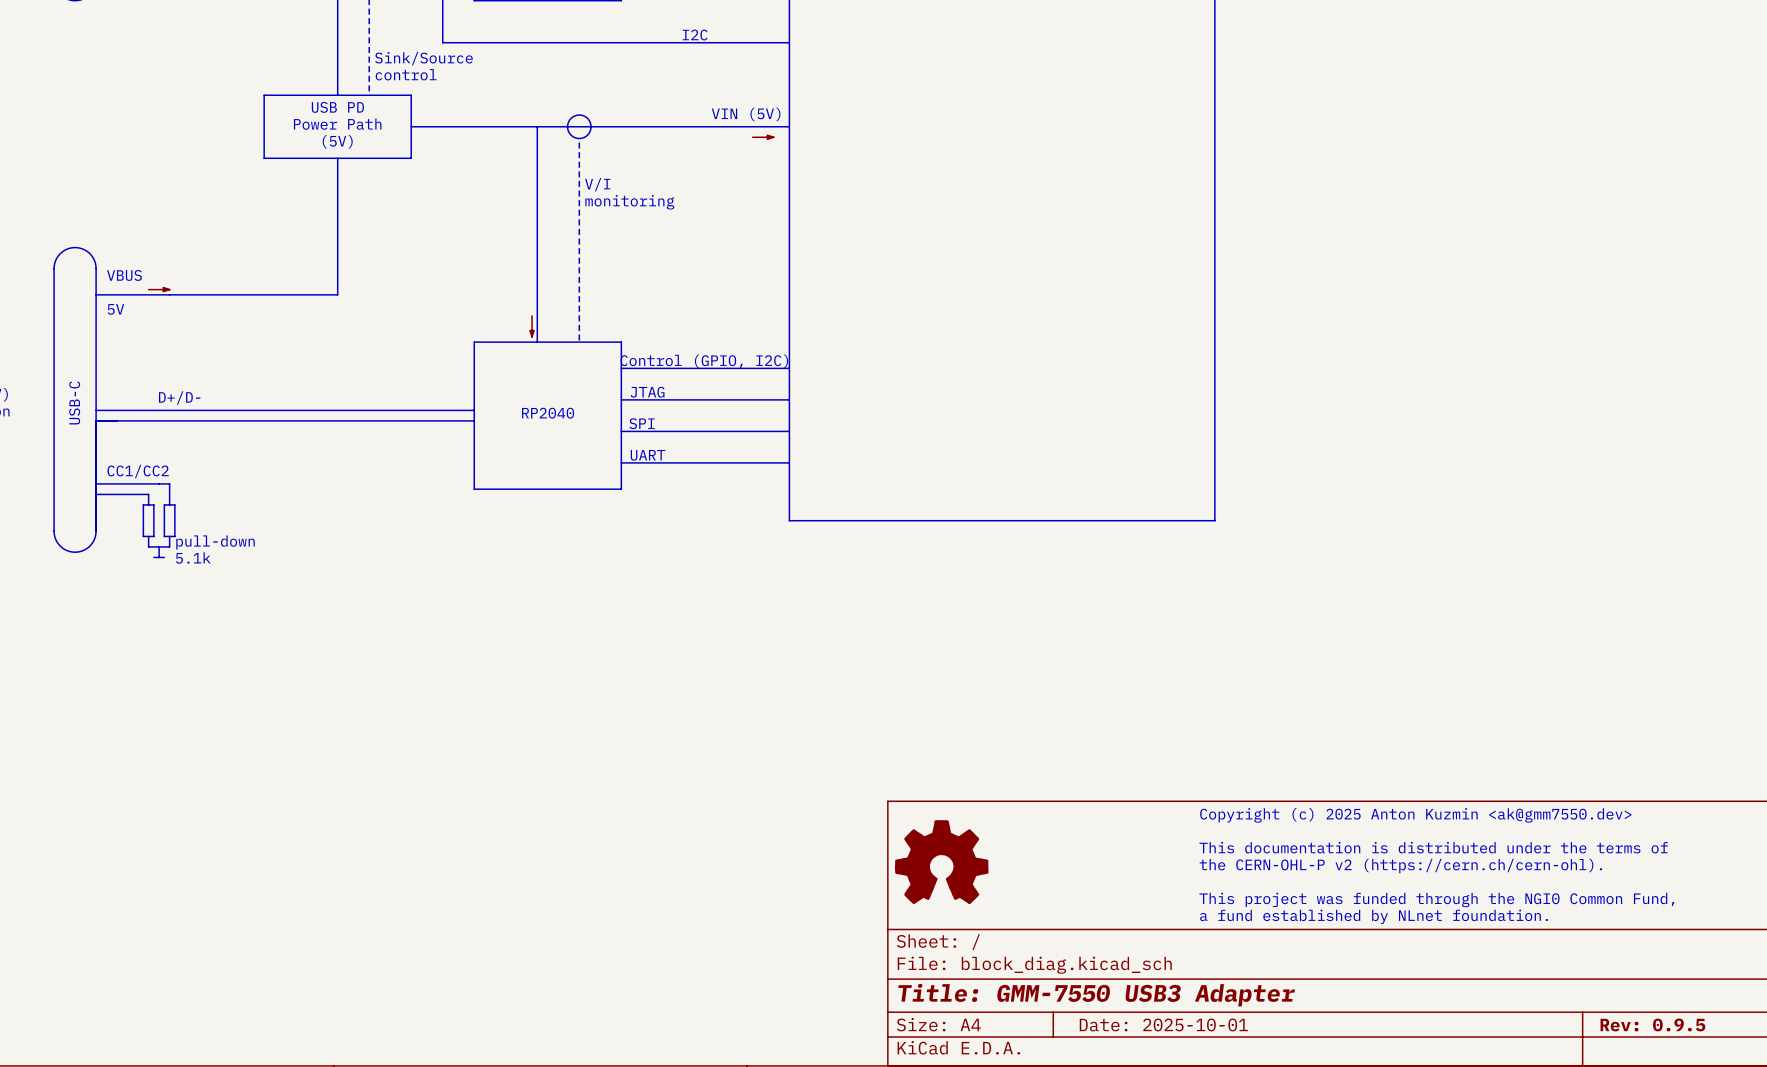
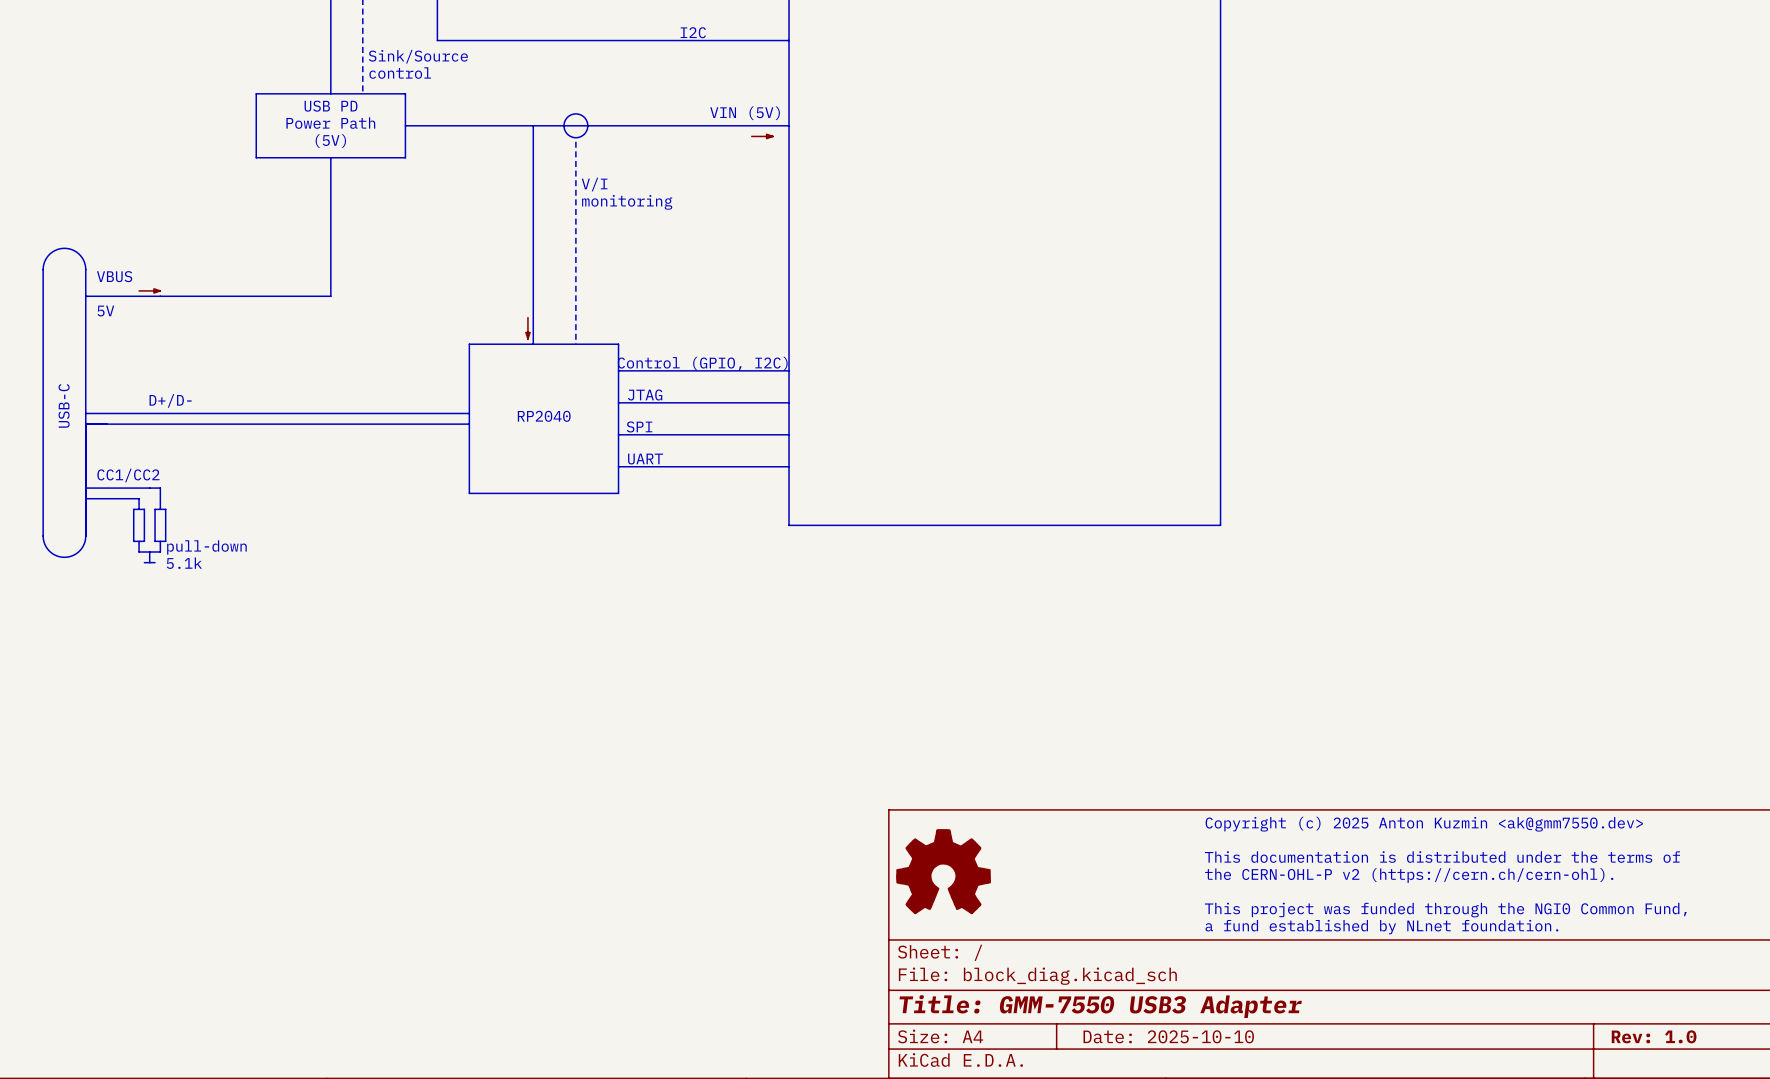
title block: Date: 2025-10-01 (1163, 1024) -> Date: 2025-10-10 (1168, 1036)
title block: Rev: 0.9.5 (1652, 1024) -> Rev: 1.0 (1654, 1036)

